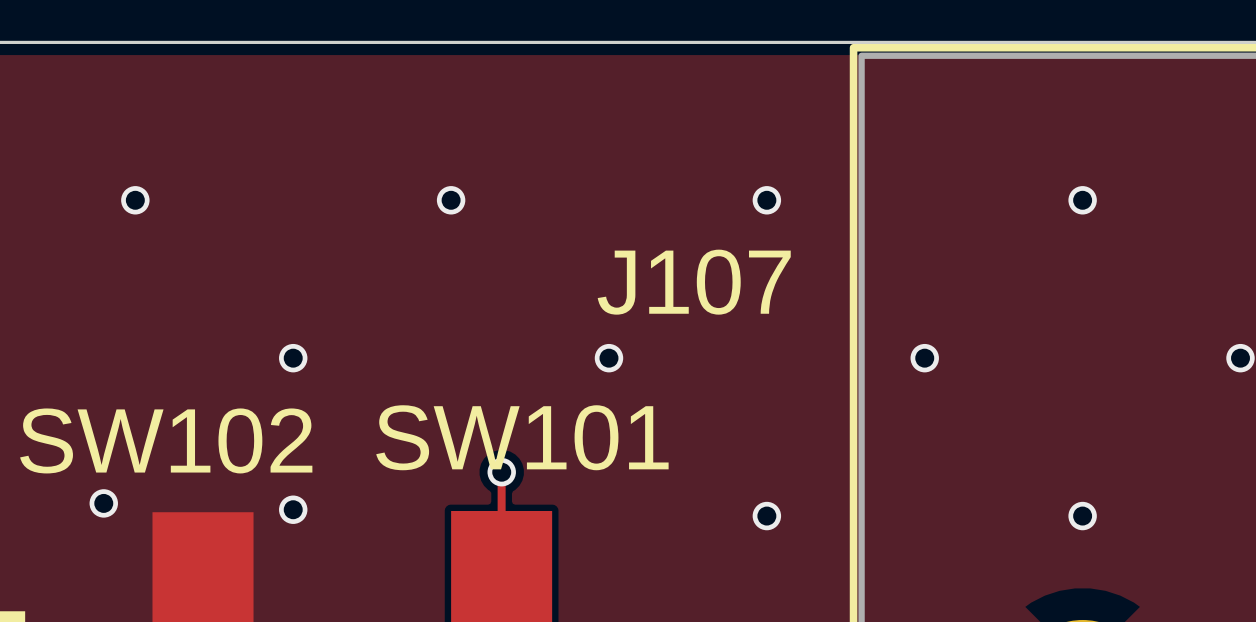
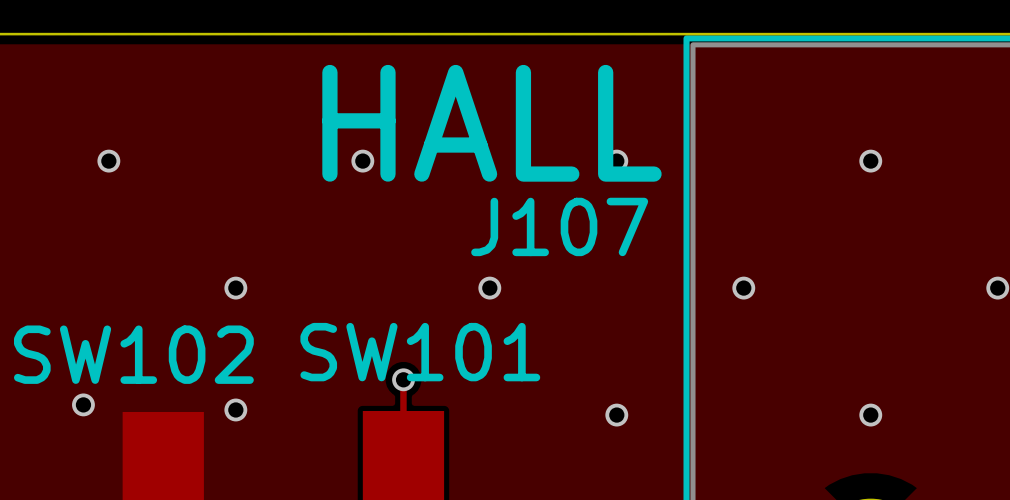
text: none -> HALL (491, 123)

